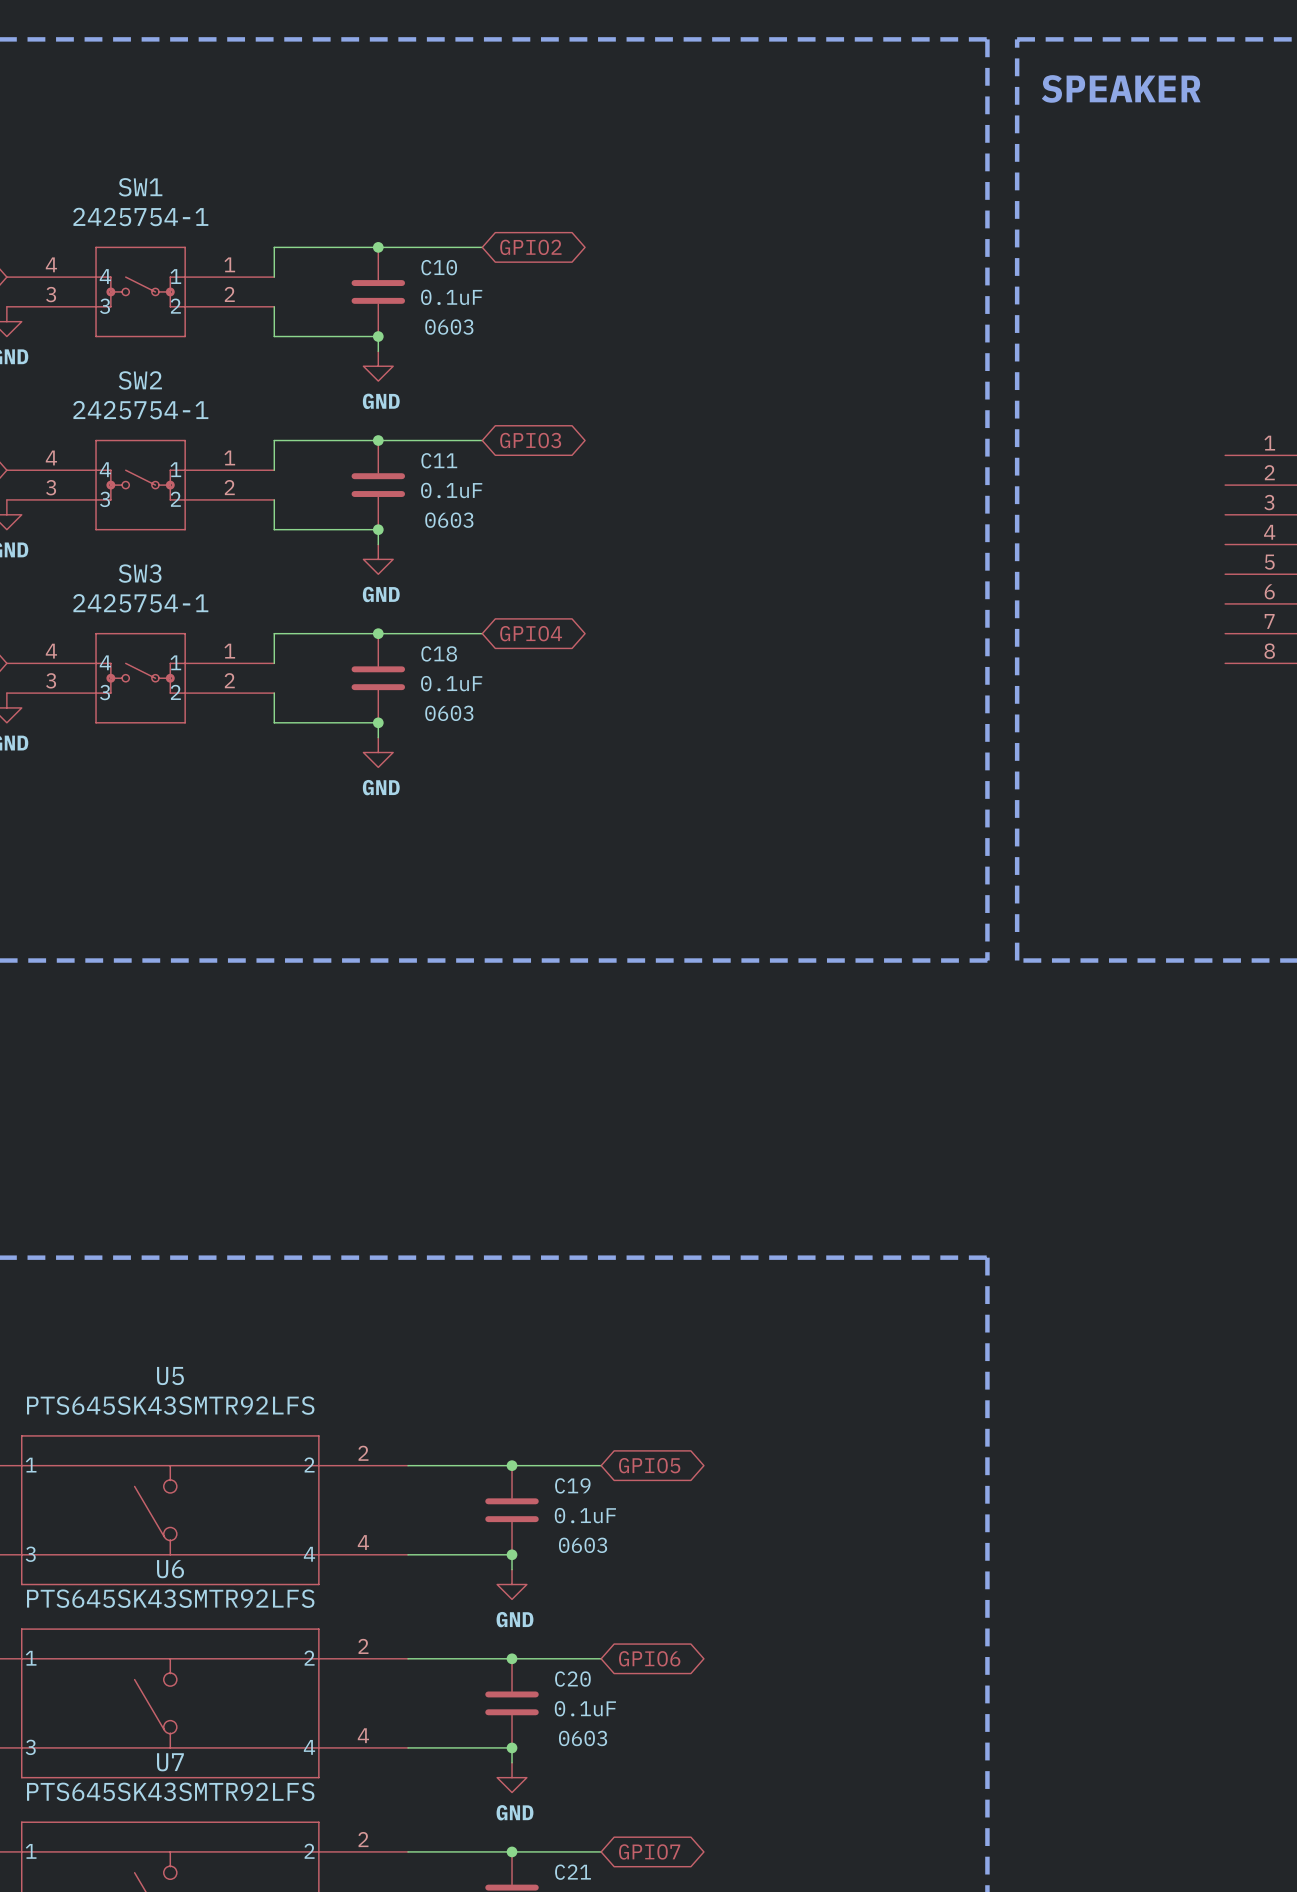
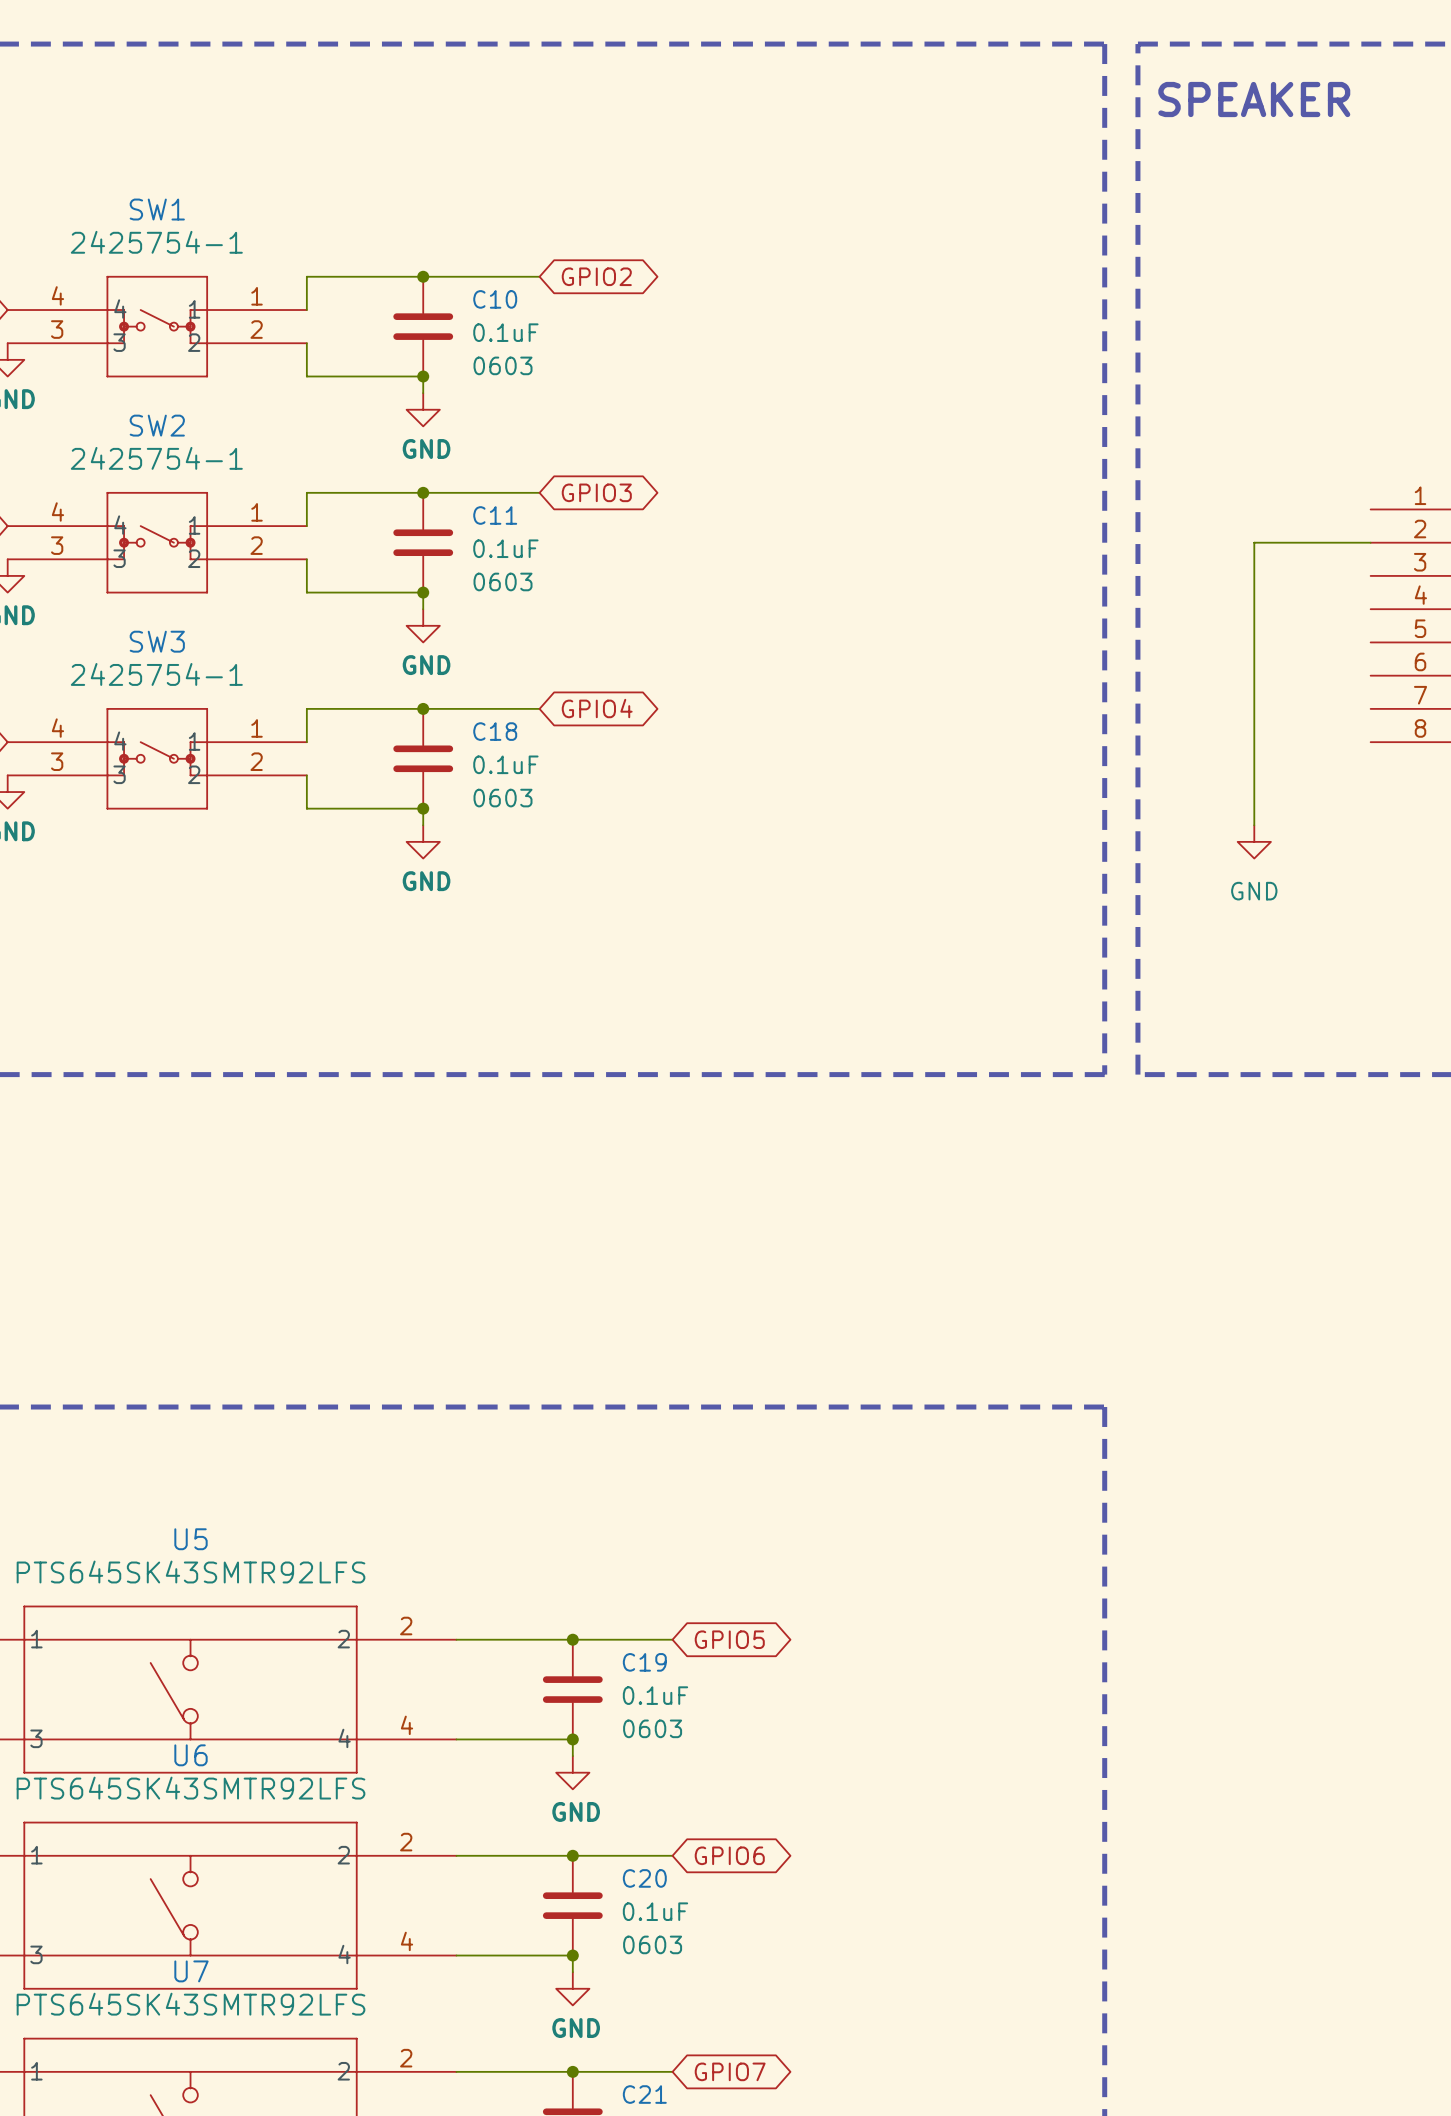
wire: none -> (1370, 542) (1254, 542) (1254, 825)
power symbol: none -> GND (1254, 841)

